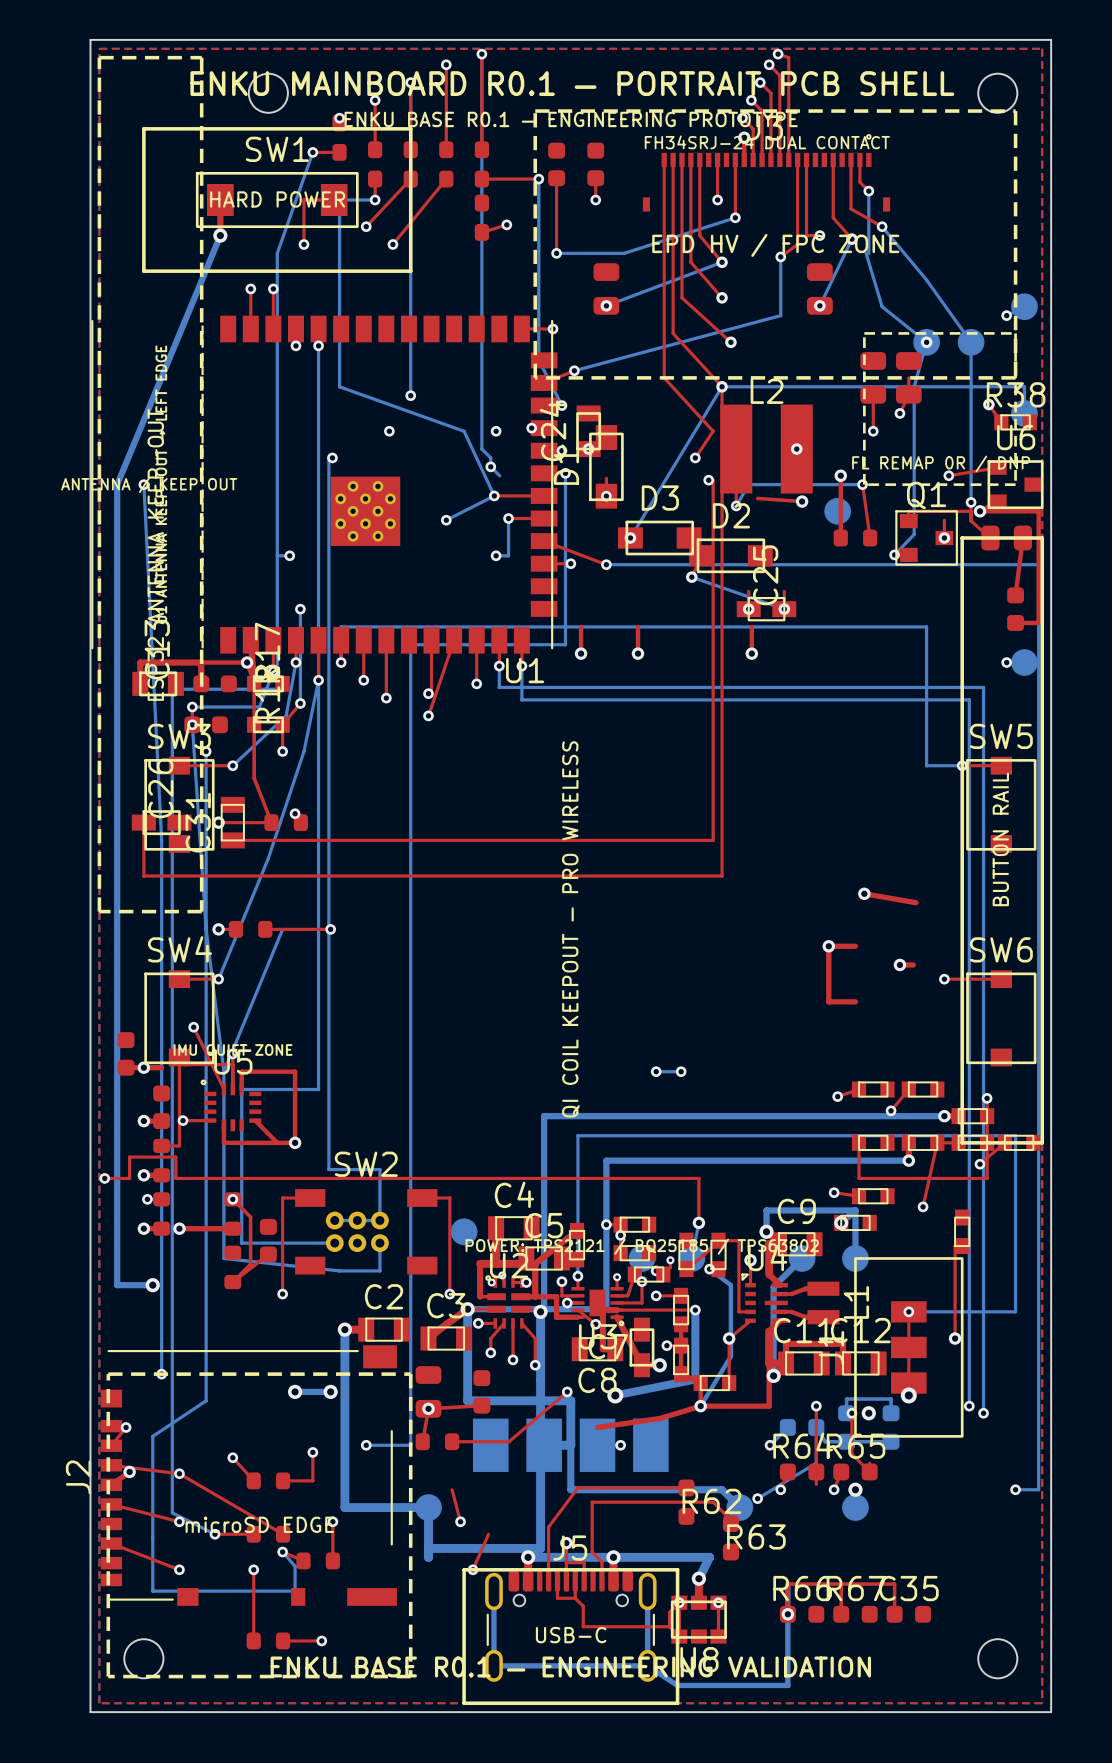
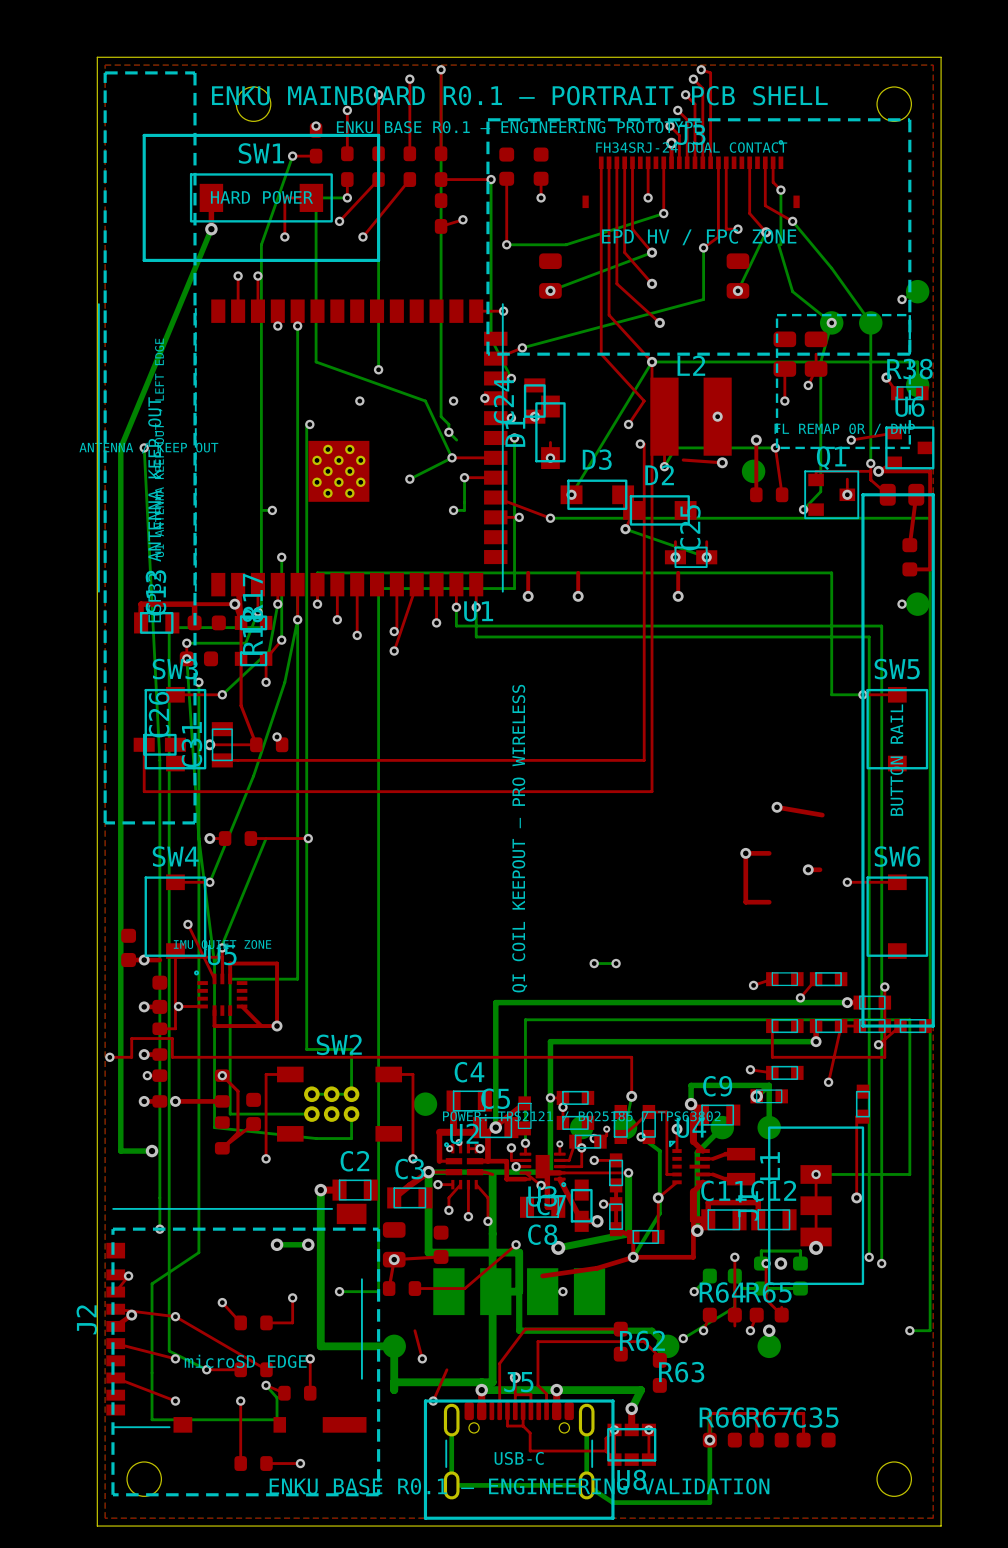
bottom track: (544, 1258) (544, 1311) (540, 1311) -> none
via position: (540, 1311) -> (495, 1127)

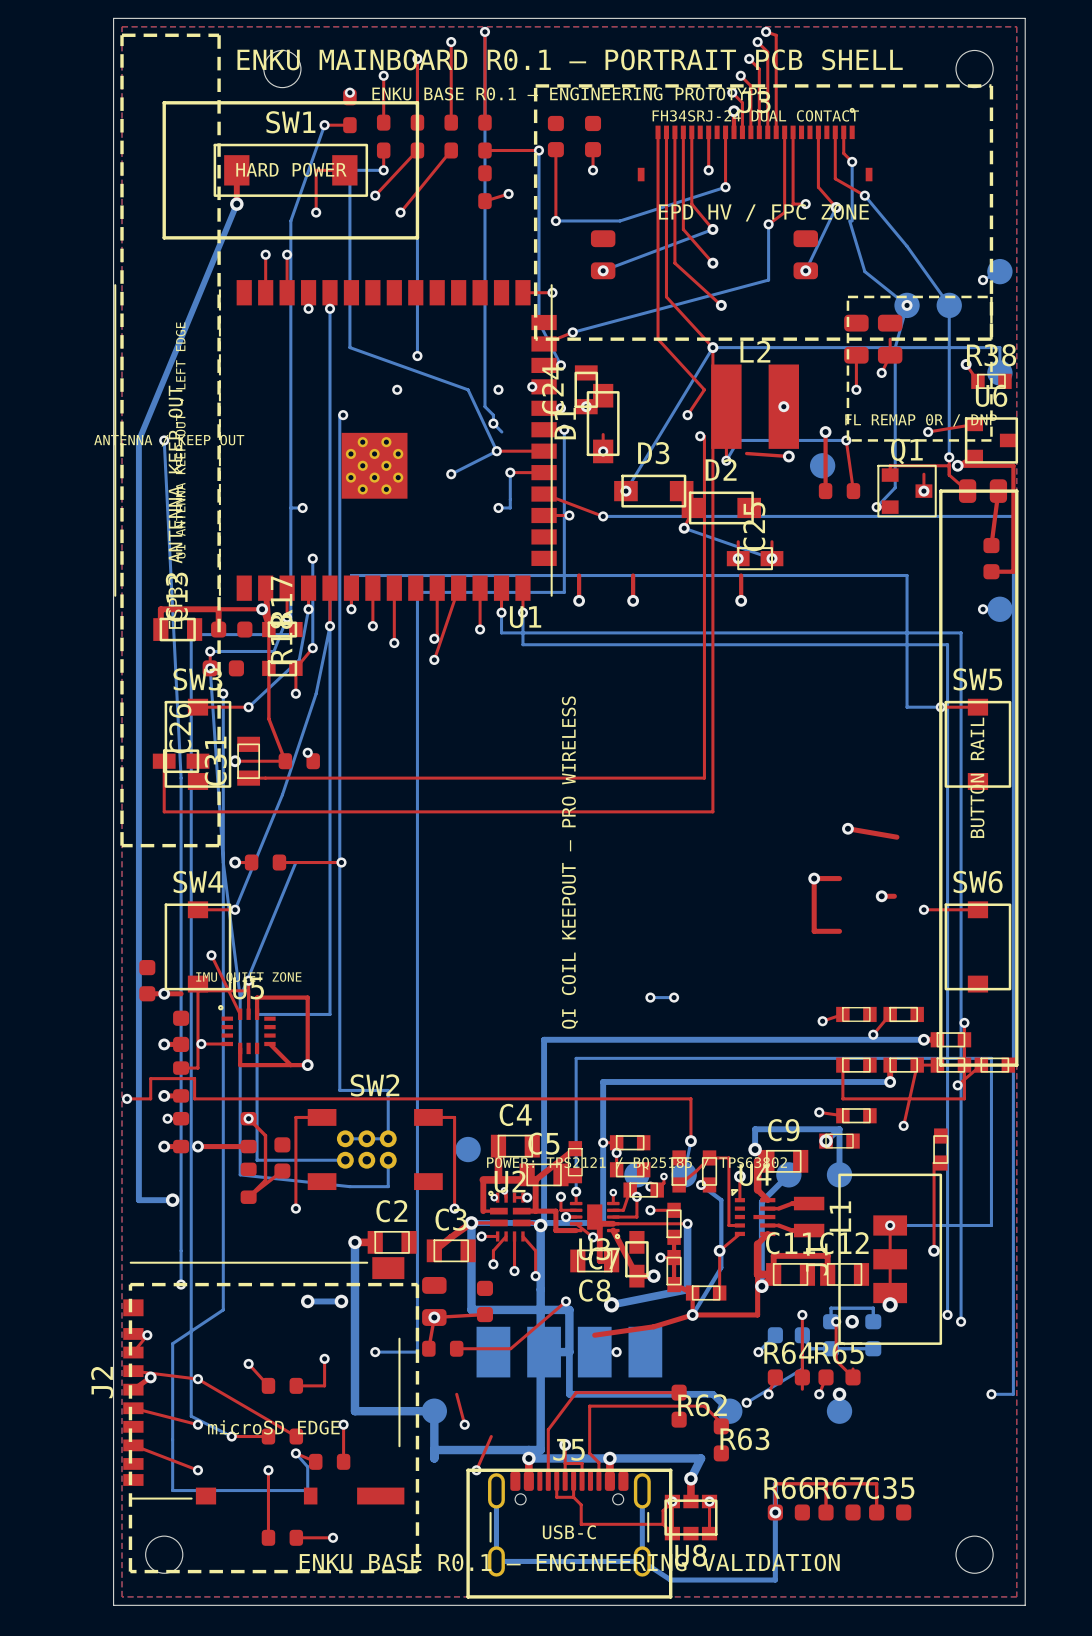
bottom track: none -> (544, 1174) (544, 1225) (540, 1225)
via position: (495, 1127) -> (540, 1225)

